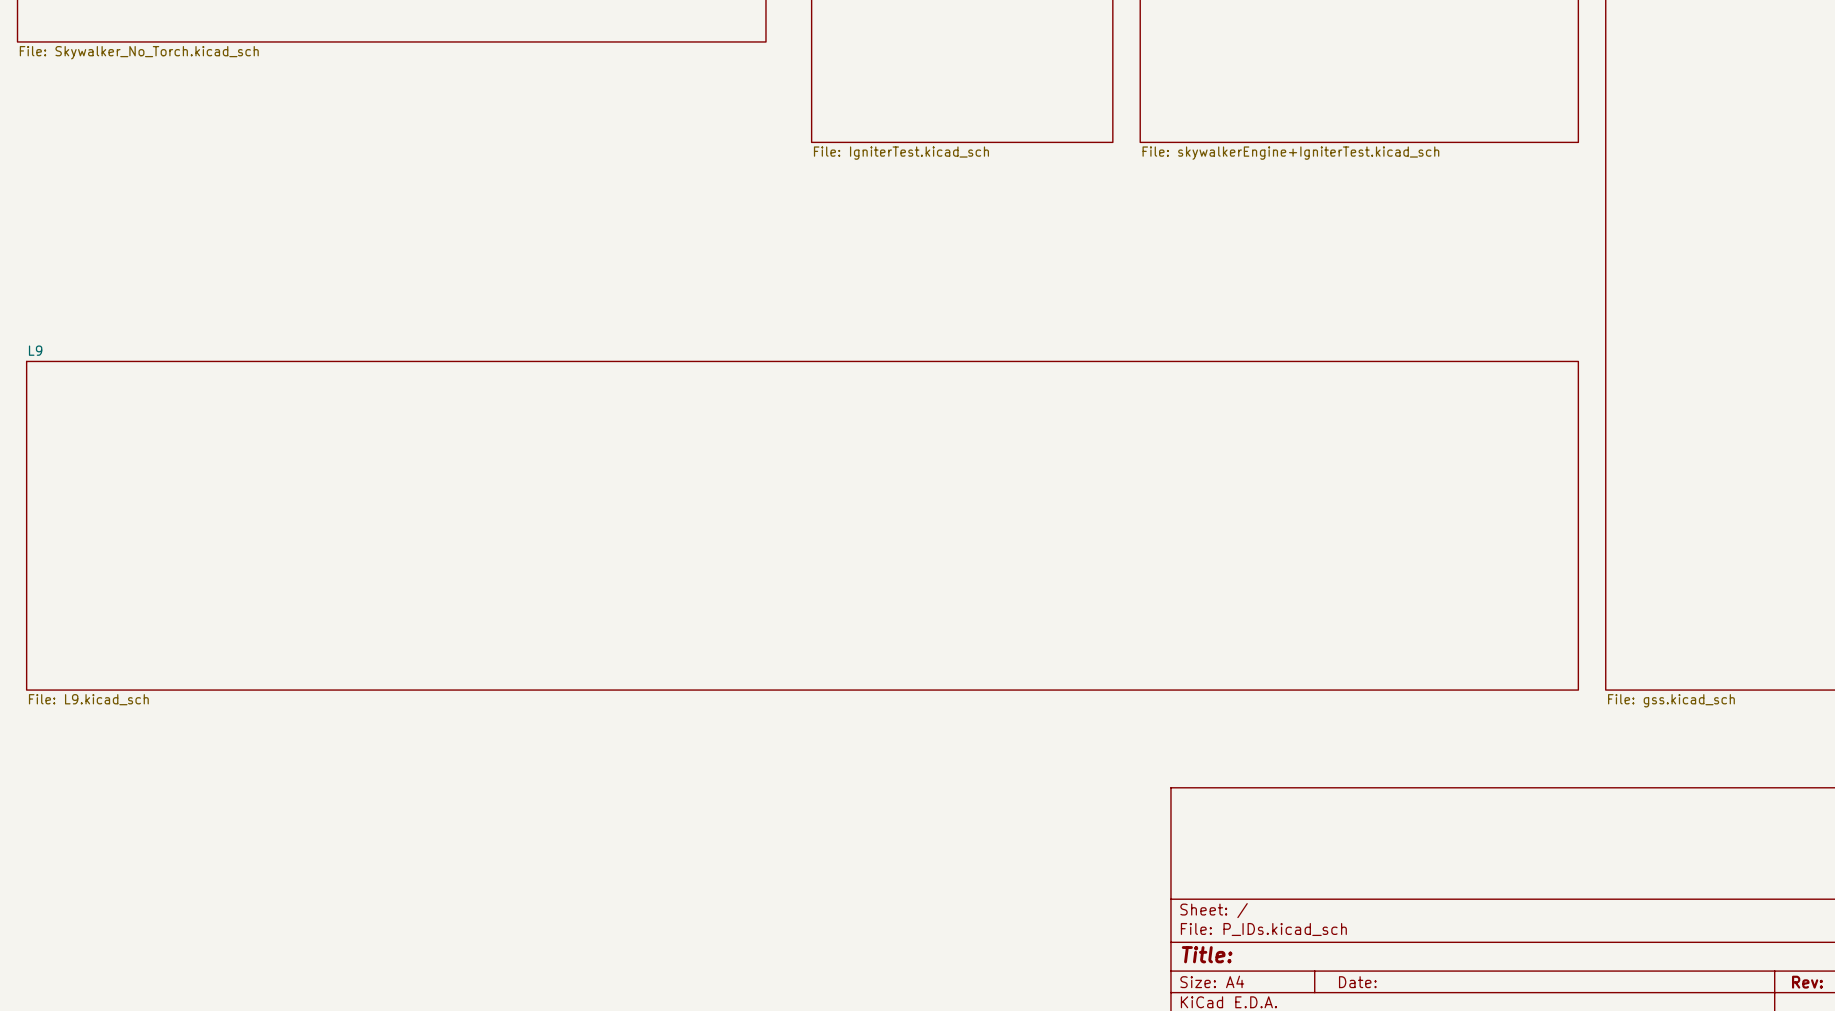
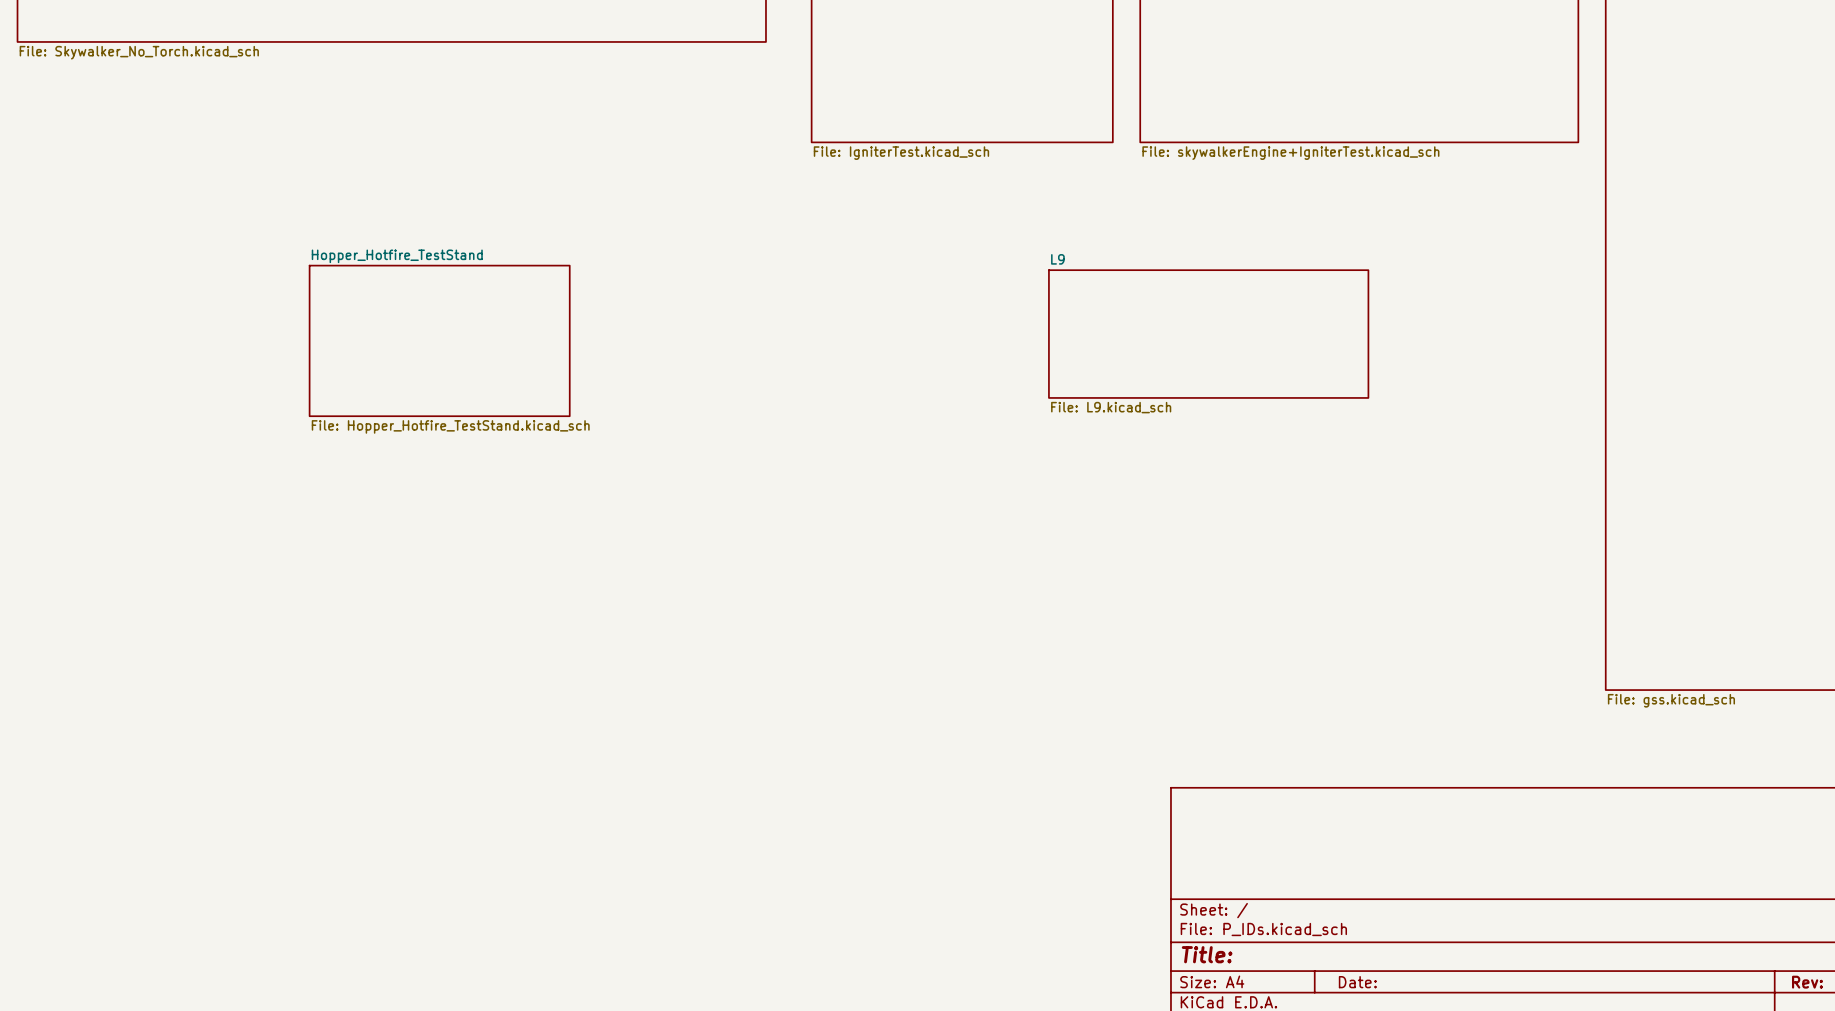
sheet Hopper_Hotfire_TestStand: none -> File: Hopper_Hotfire_TestStand.kicad_sch (439, 340)
sheet L9 name position: L9 (35, 350) -> L9 (1057, 259)
sheet L9 shape: [26, 360, 1579, 691] -> [1048, 269, 1369, 399]
sheet L9 value position: File: L9.kicad_sch (88, 699) -> File: L9.kicad_sch (1111, 407)

